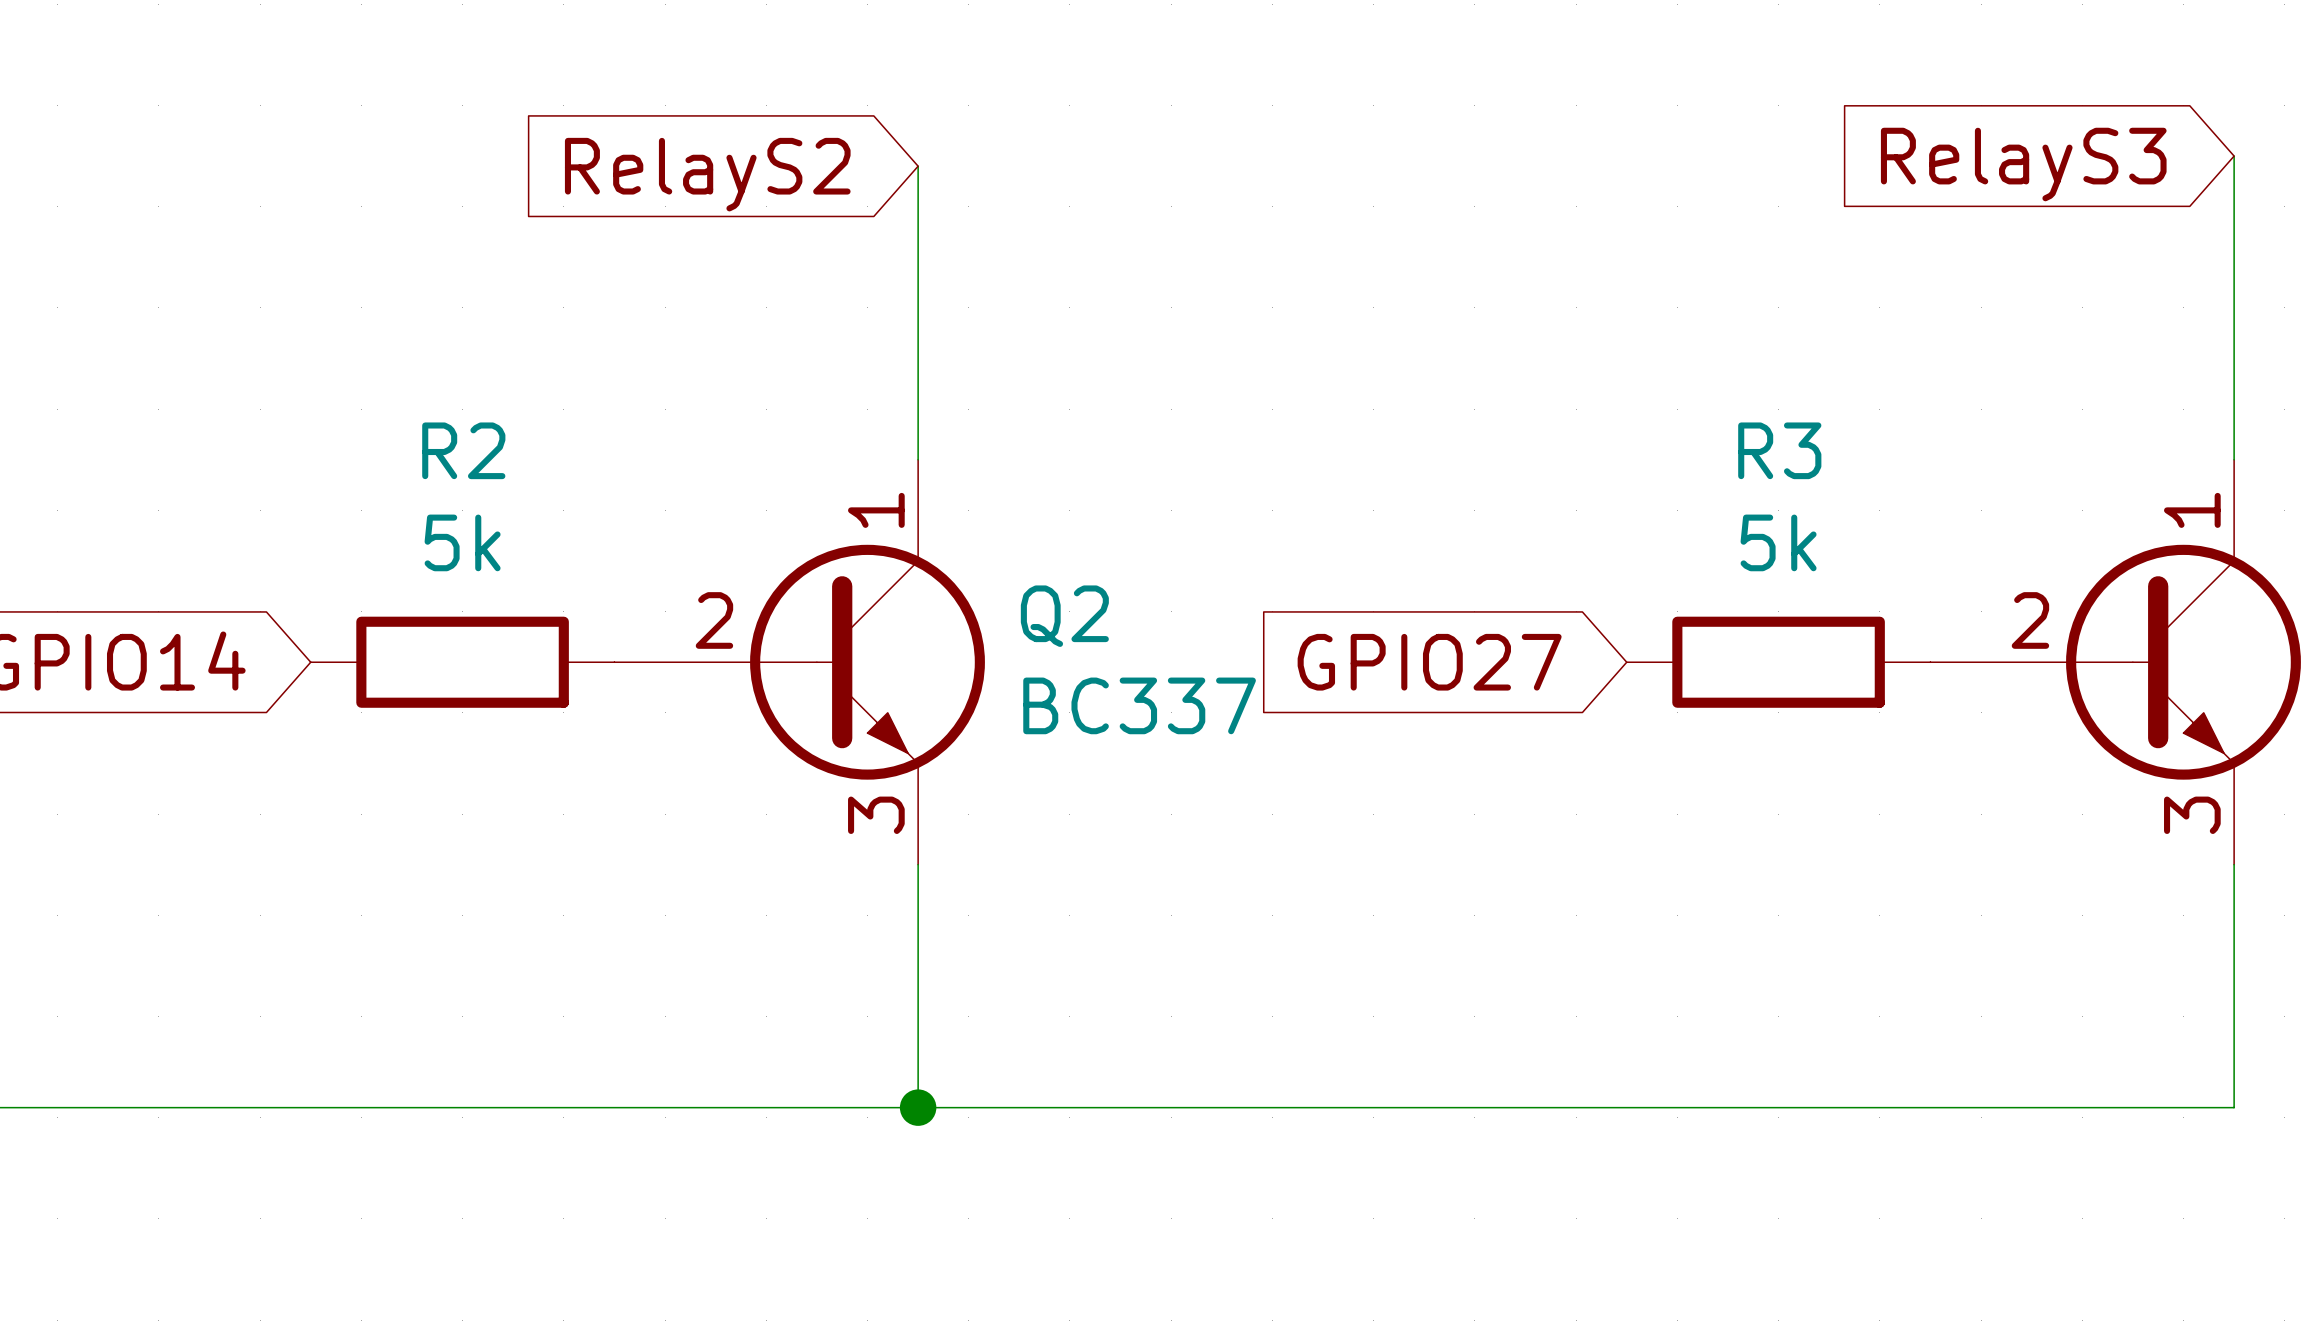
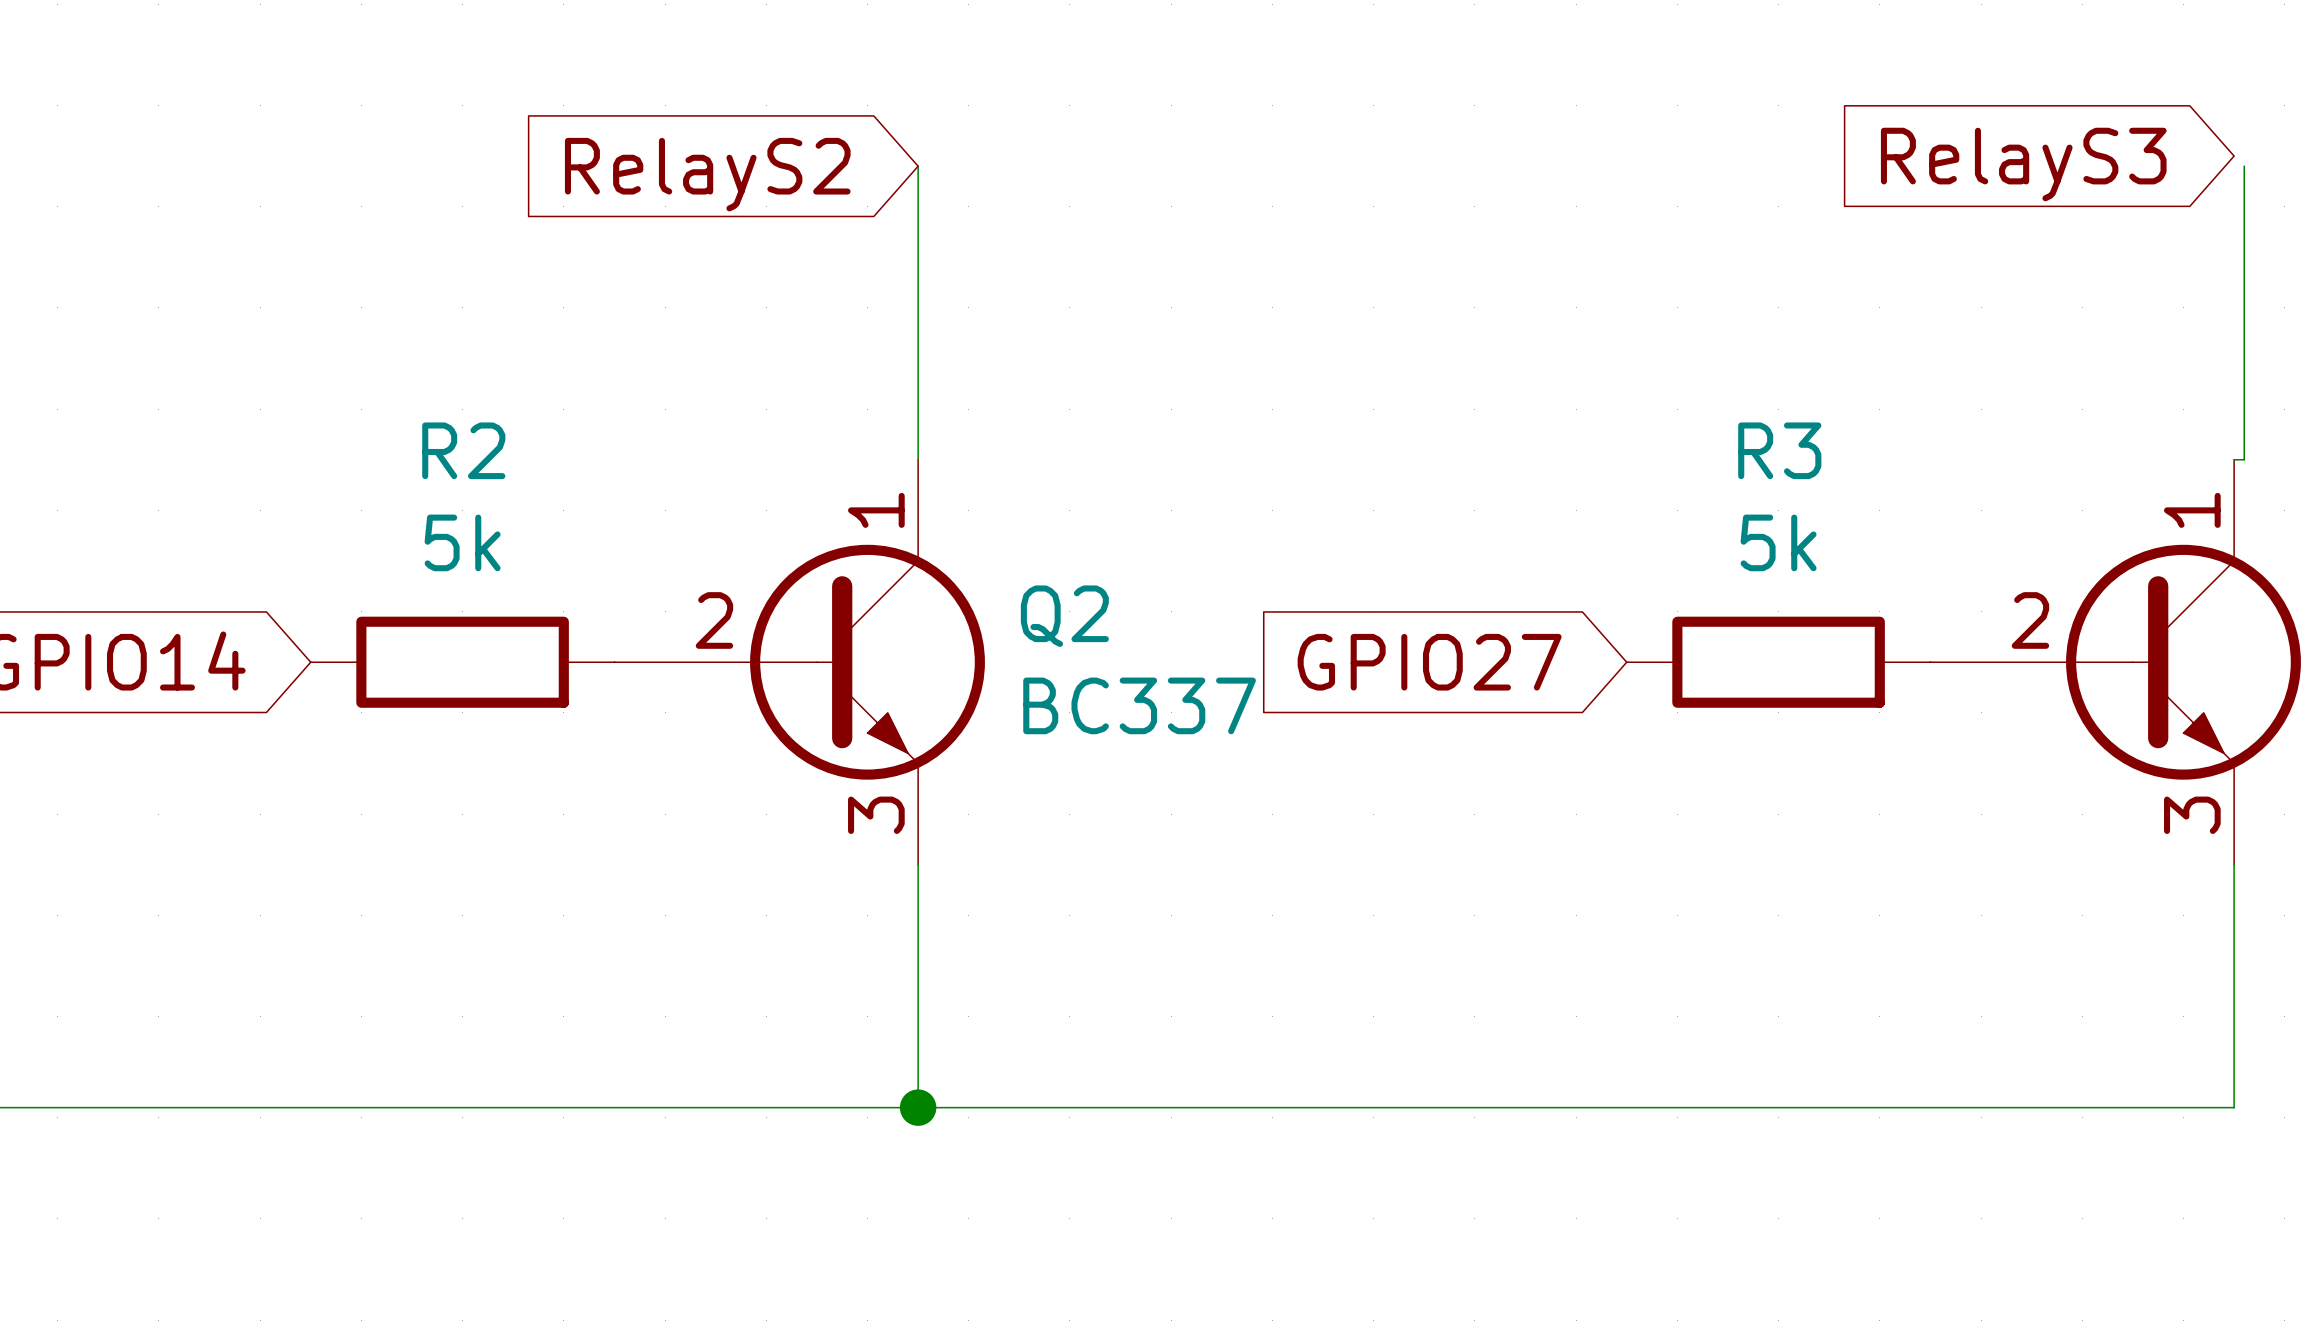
wire: (2234, 156) (2234, 459) -> (2244, 166) (2244, 459) (2234, 459)

